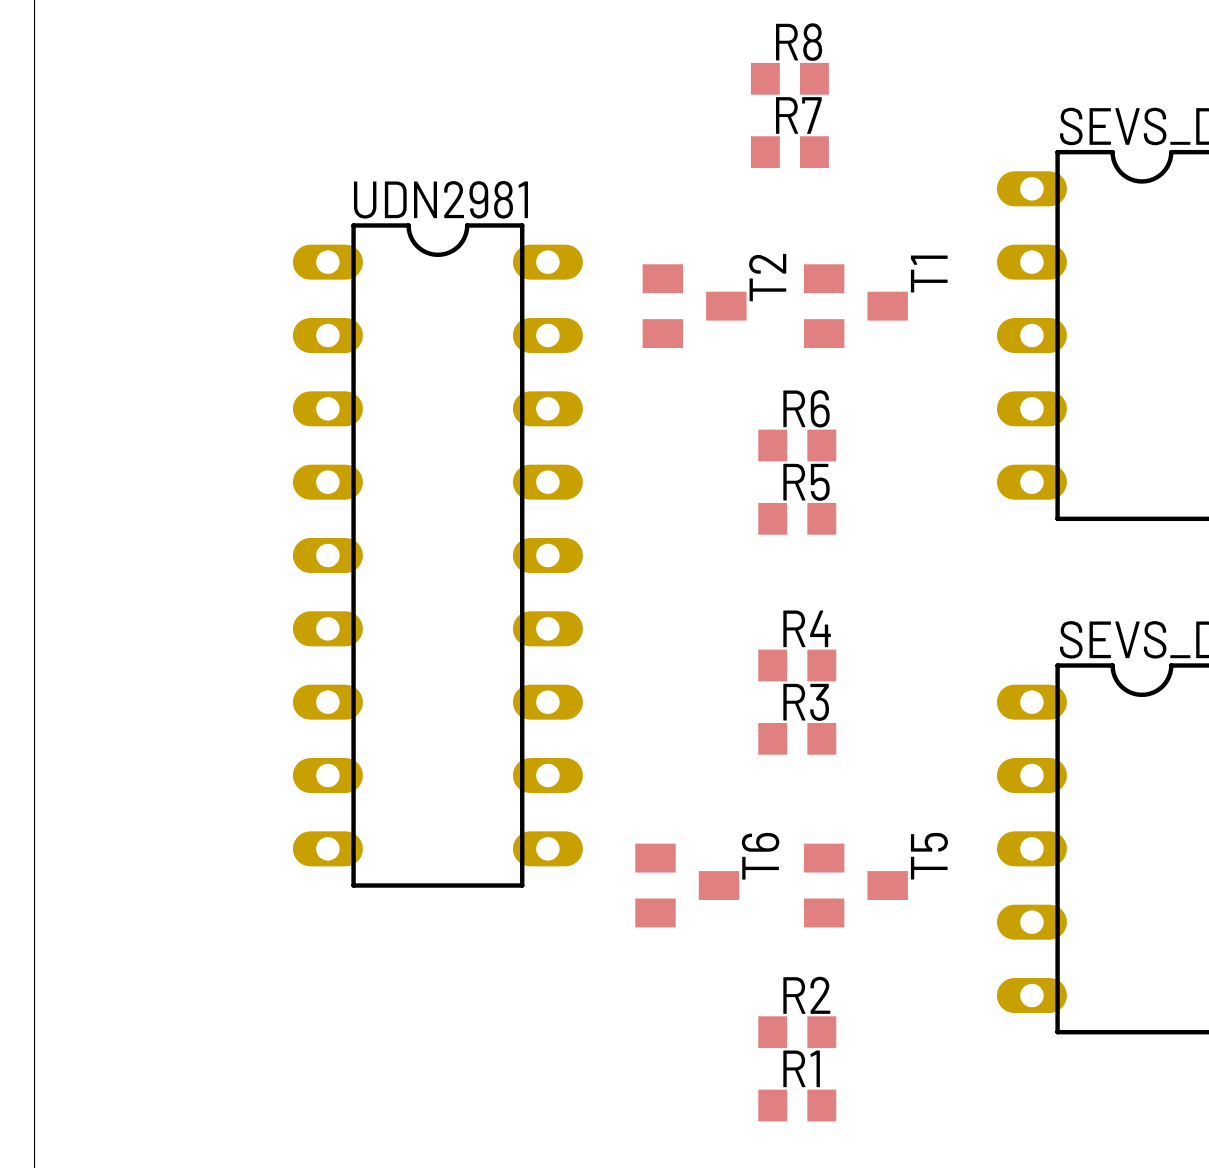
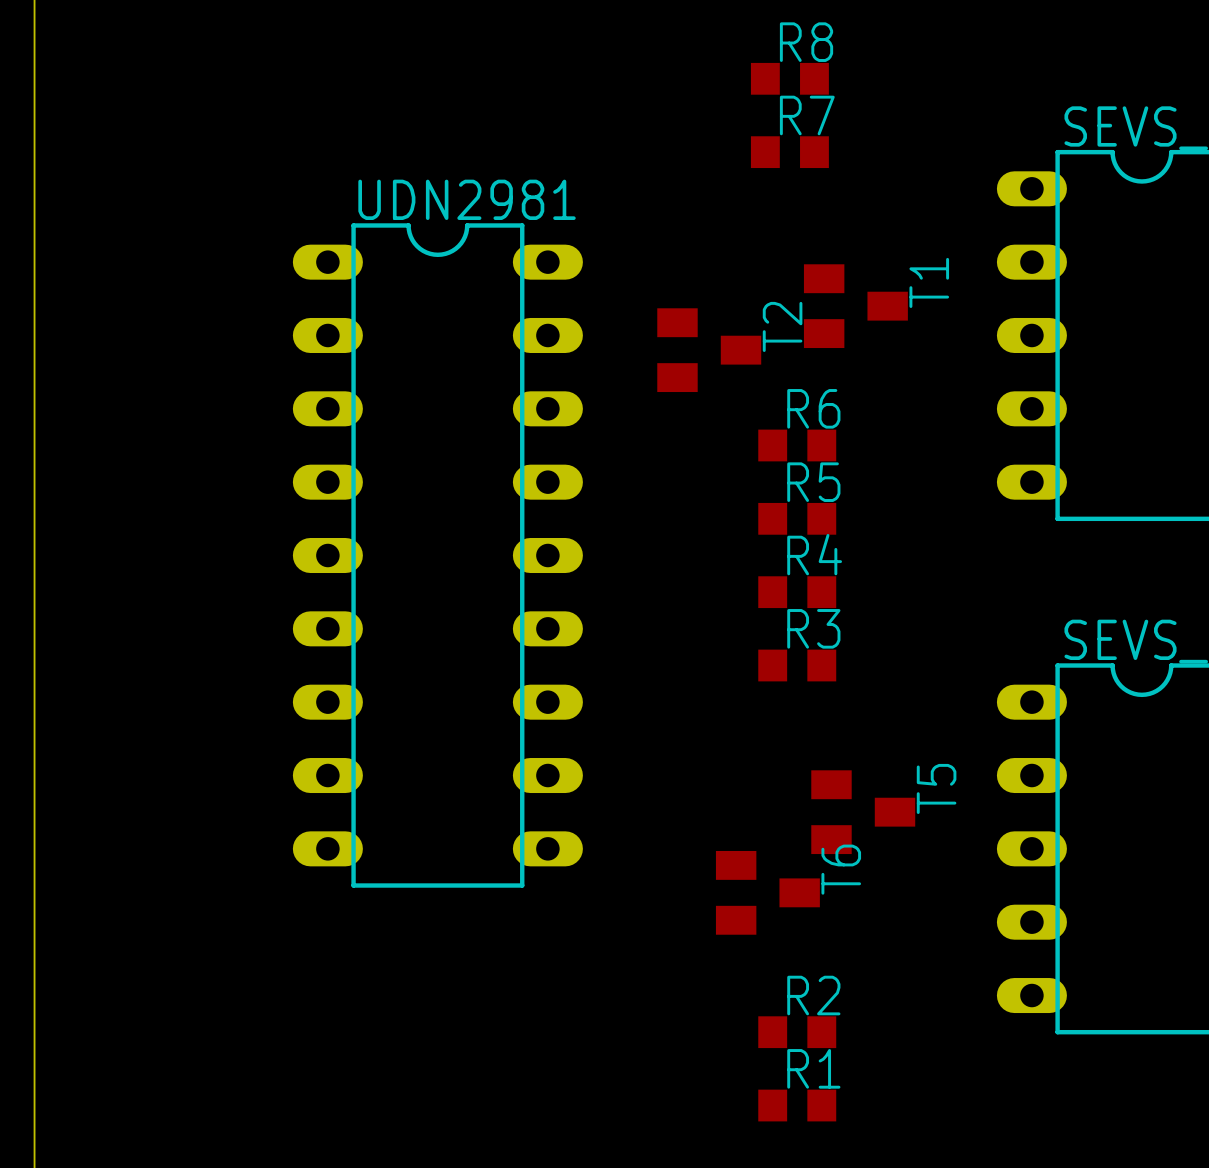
T2 position: (694, 306) -> (709, 350)
R4: none -> (797, 592)
R4 name: R4 (807, 628) -> R3 (813, 628)
R3: (797, 738) -> none
T6 position: (687, 885) -> (767, 892)
T5 position: (855, 885) -> (863, 812)

